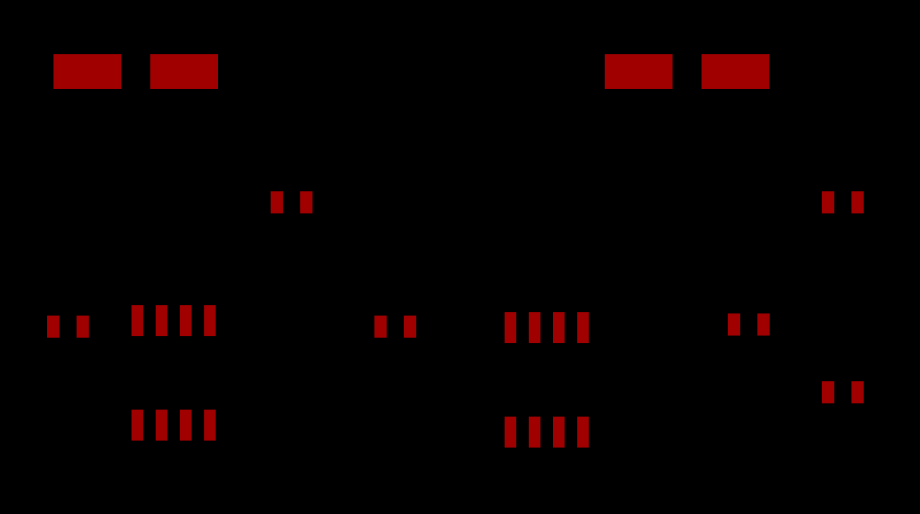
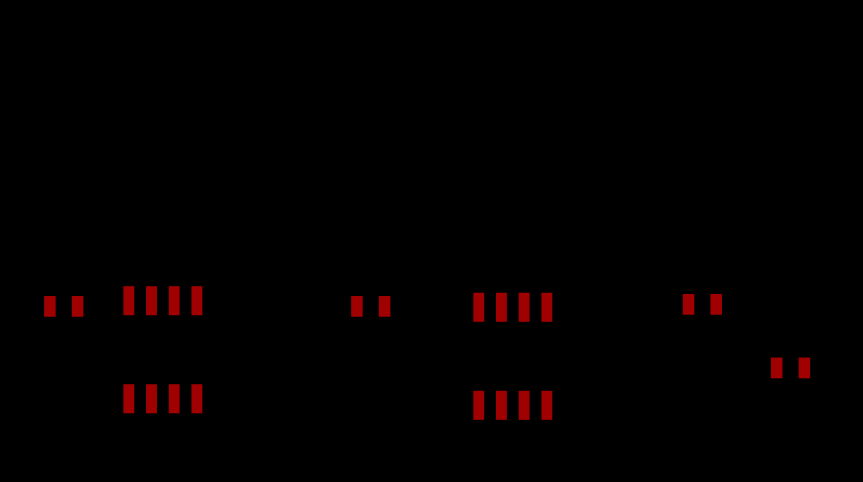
part: (135, 71) -> none
part: (687, 71) -> none
part: (291, 202) -> none
part: (842, 202) -> none

